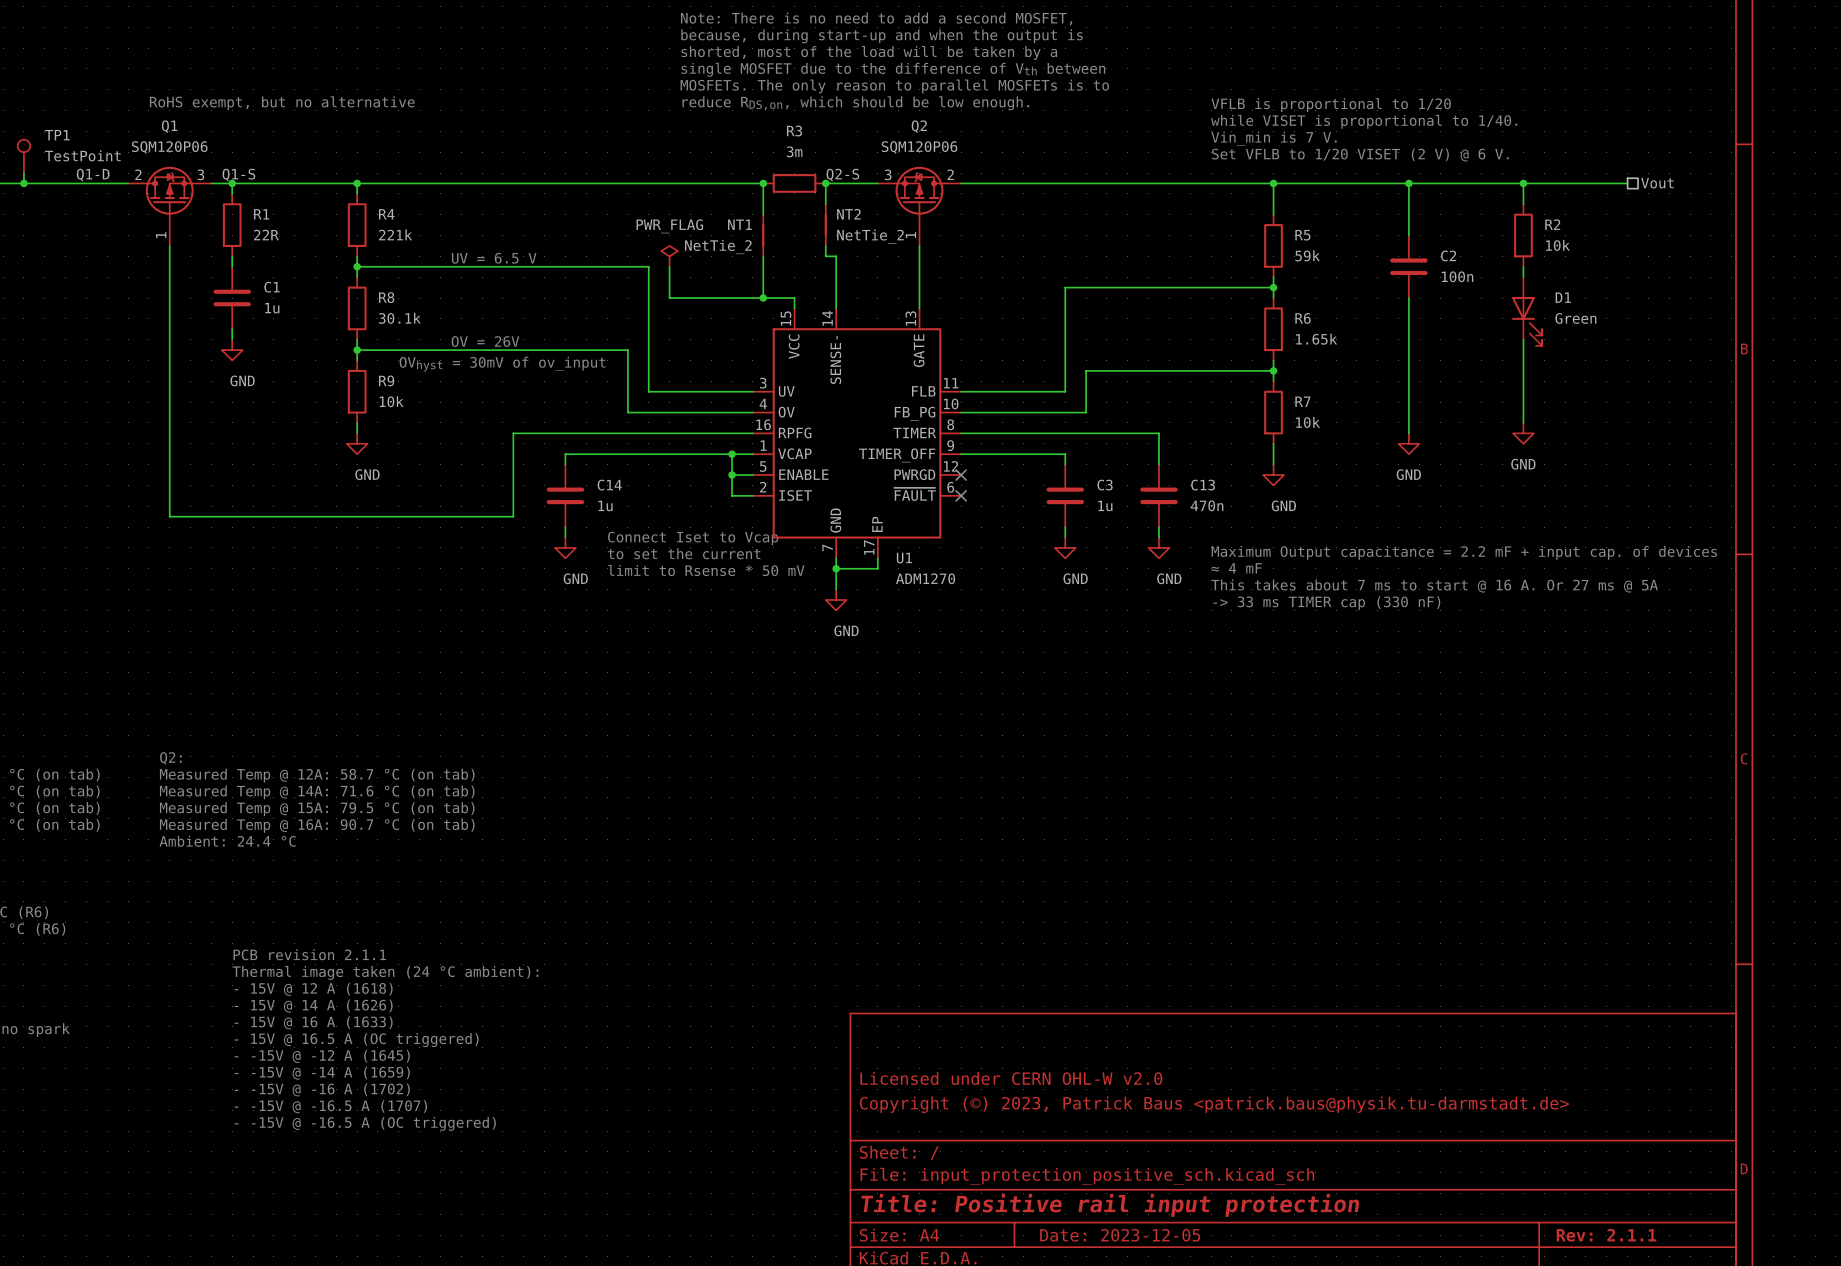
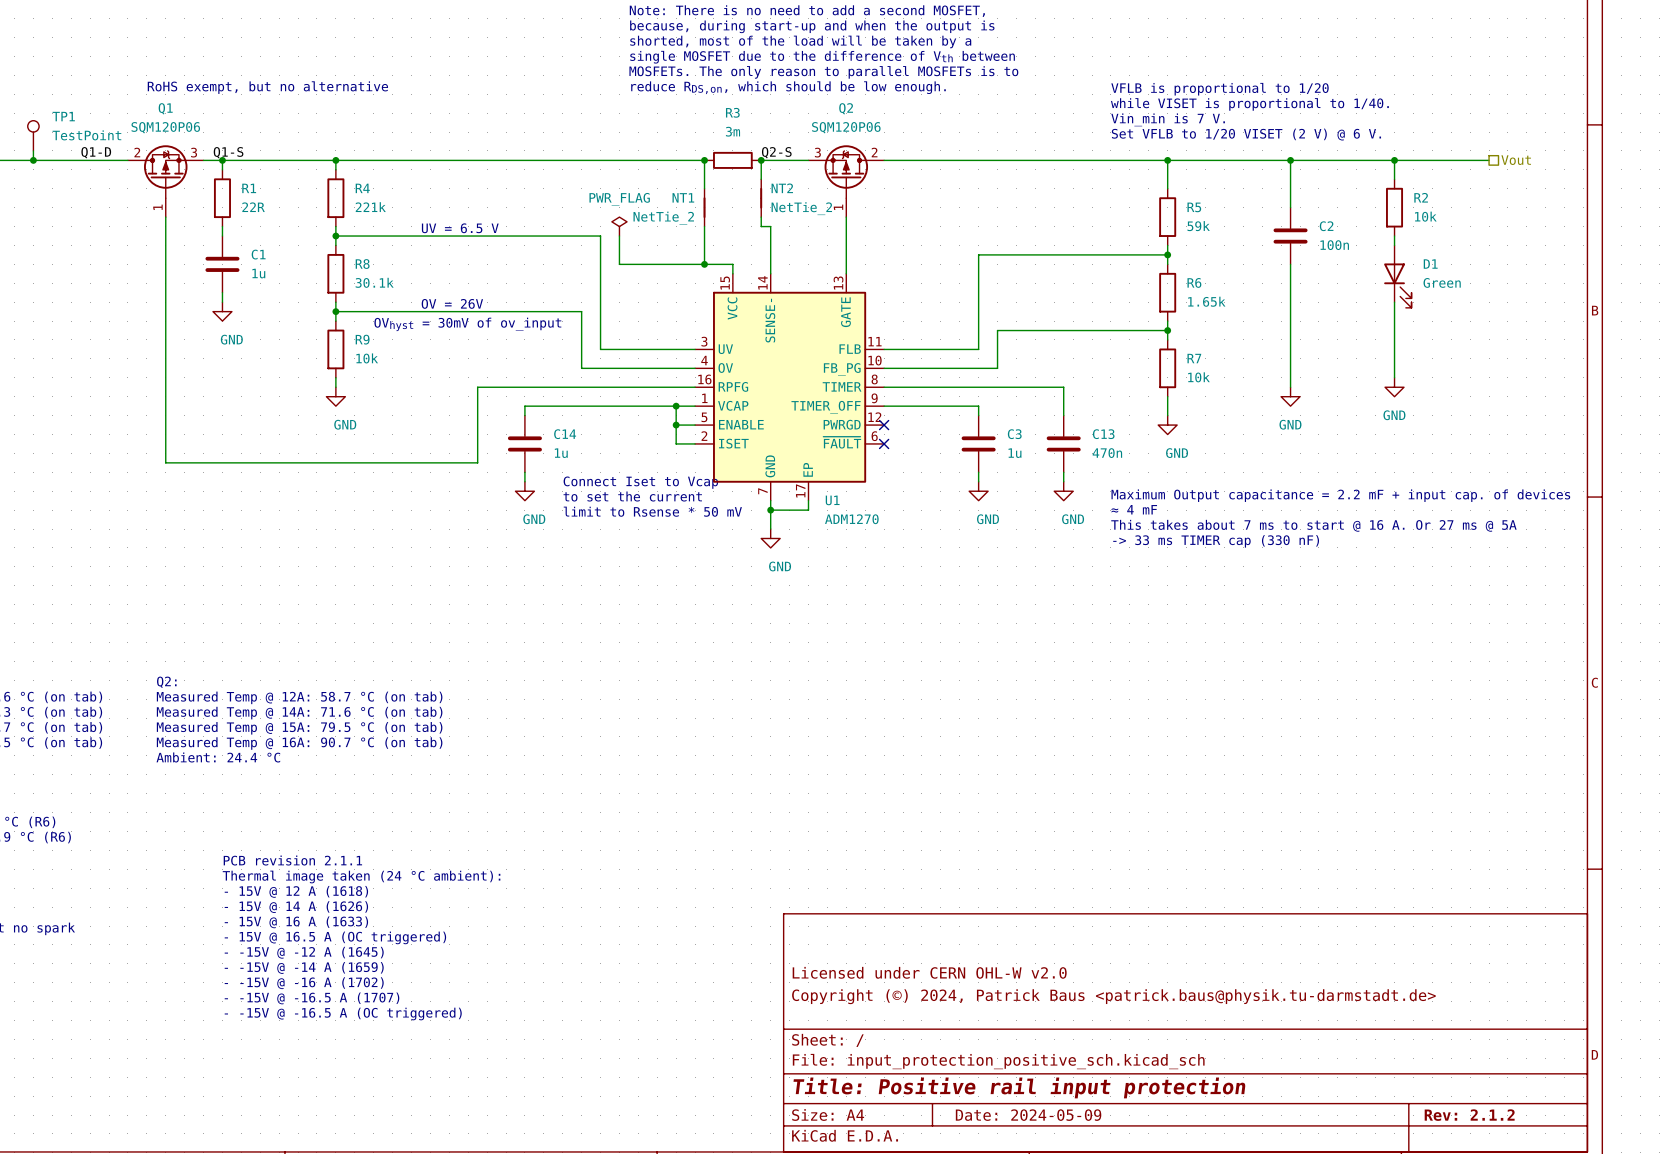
title block: Copyright (©) 2023, Patrick Baus <patrick.baus@physik.tu-darmstadt.de> (1214, 1104) -> Copyright (©) 2024, Patrick Baus <patrick.baus@physik.tu-darmstadt.de> (1113, 996)
title block: Date: 2023-12-05 (1120, 1235) -> Date: 2024-05-09 (1028, 1115)
title block: Rev: 2.1.1 (1606, 1235) -> Rev: 2.1.2 (1469, 1115)

